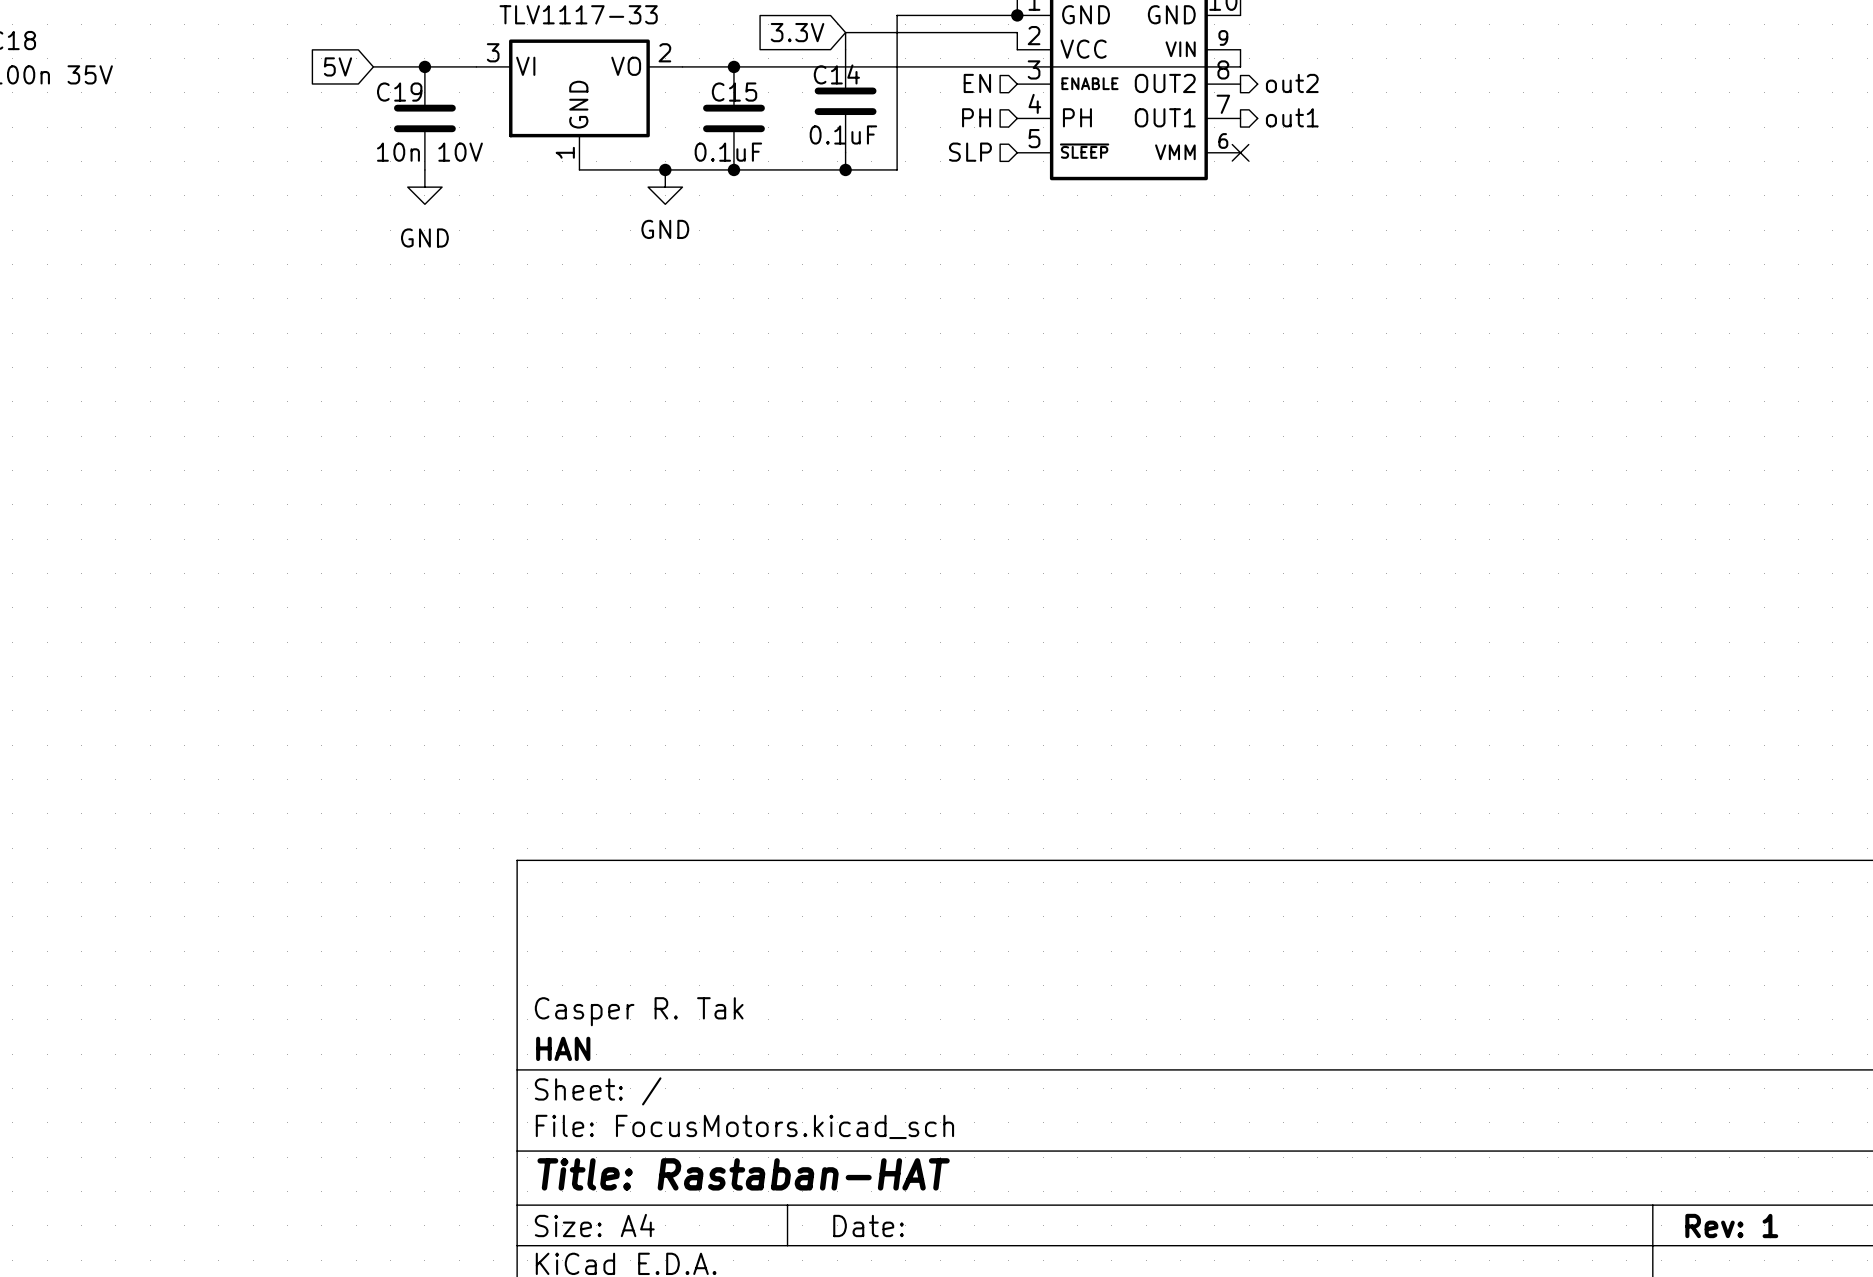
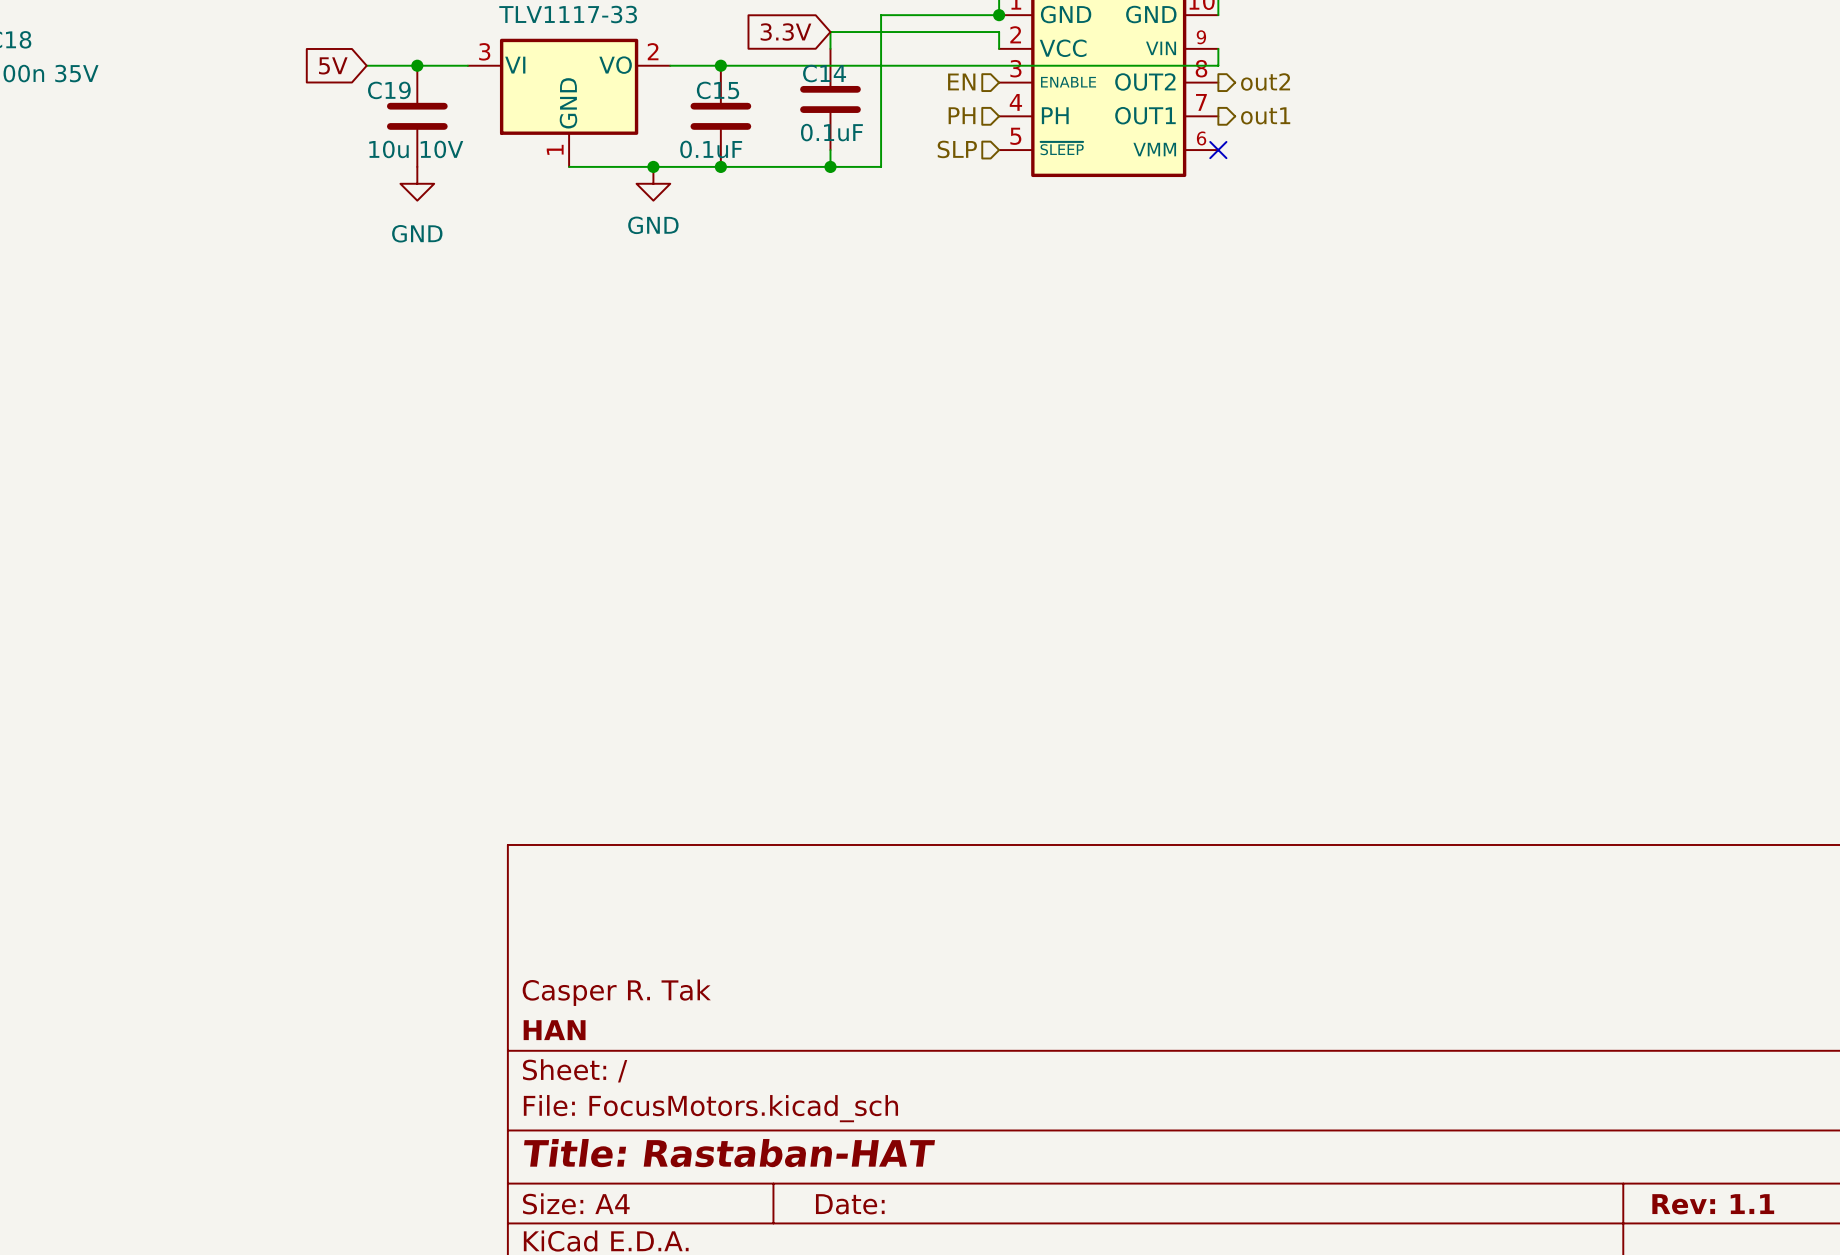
C19 value: 10n 10V (429, 152) -> 10u 10V (416, 149)
title block: Rev: 1 (1731, 1226) -> Rev: 1.1 (1713, 1204)

